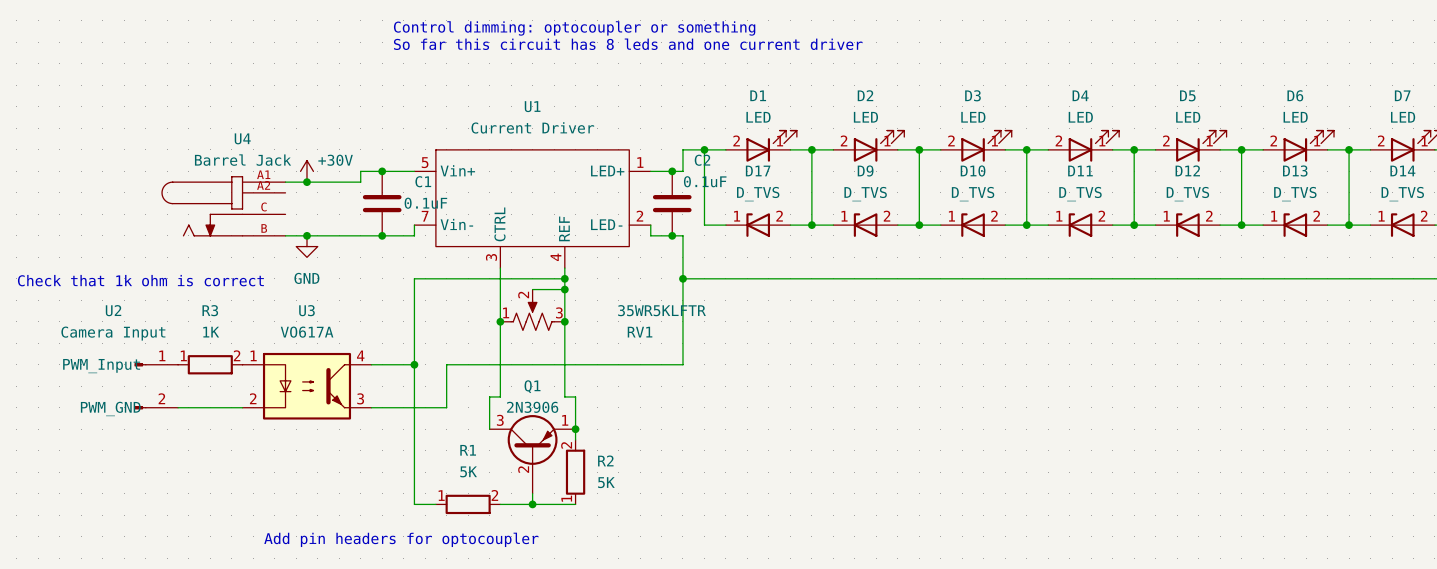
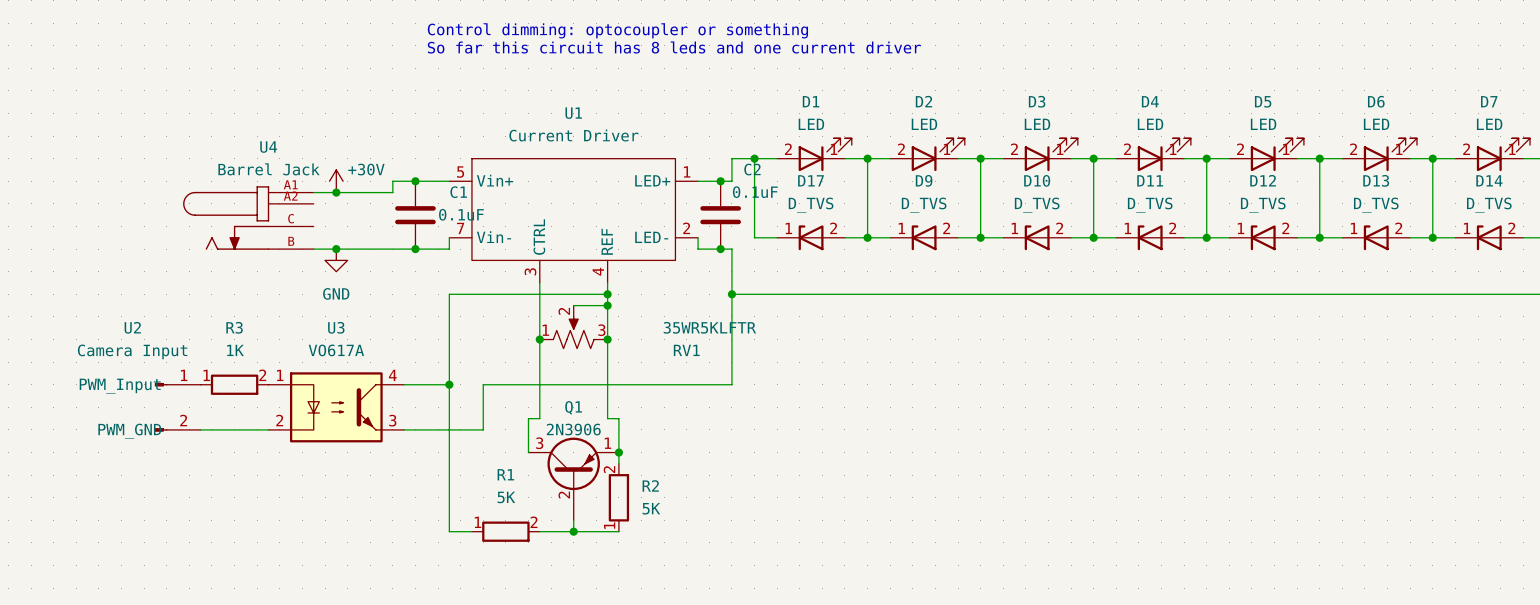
text: Check that 1k ohm is correct (140, 280) -> none
text: Add pin headers for optocoupler (401, 539) -> none

